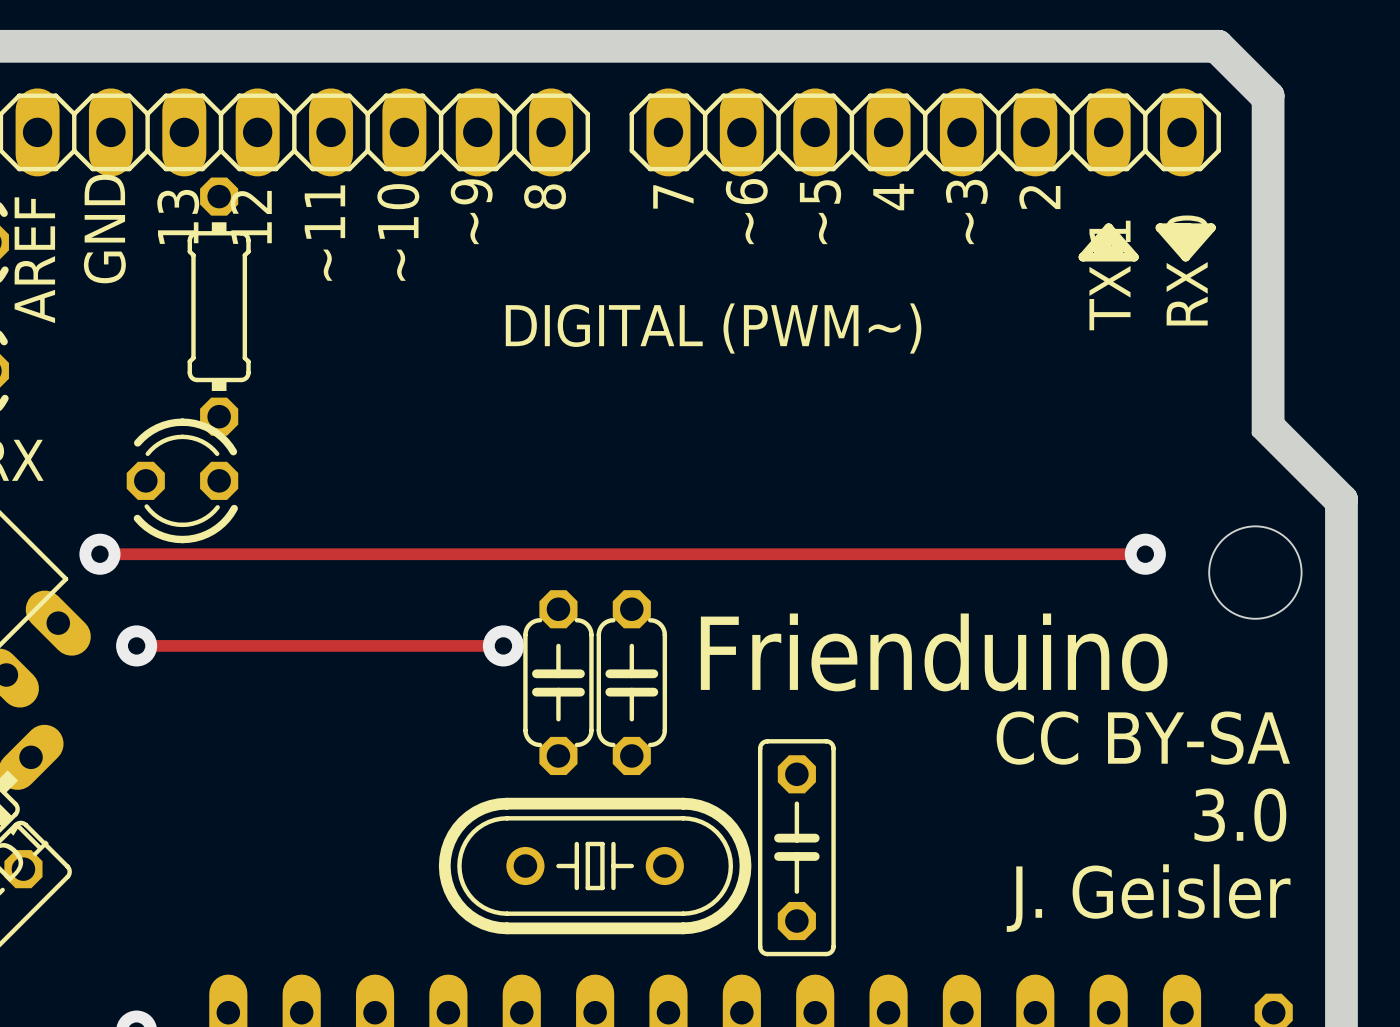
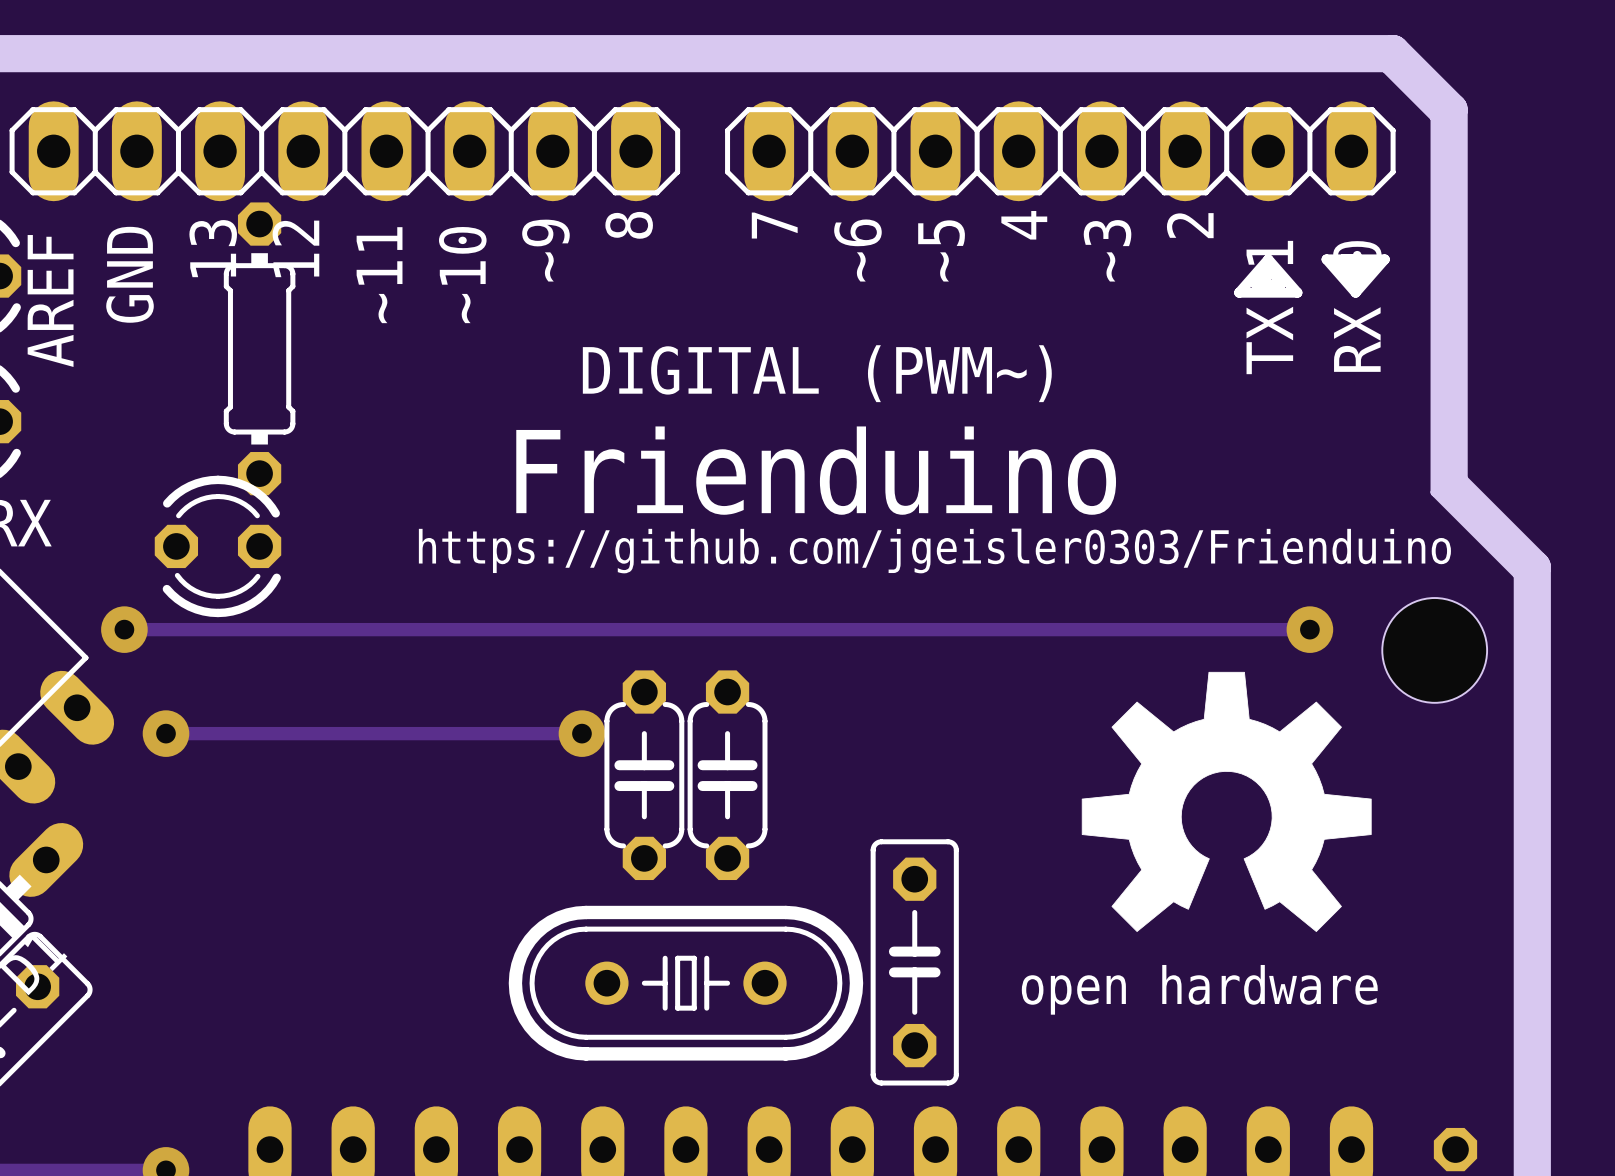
text: none -> https://github.com/jgeisler0303/Frienduino (934, 550)
drawing: none -> [1081, 671, 1372, 932]
text position: Frienduino (934, 652) -> Frienduino (816, 470)
text: CC BY-SA (1143, 738) -> none
text: 3.0 (1240, 815) -> none
text: none -> open hardware (1199, 989)
text: J. Geisler (1148, 898) -> none

